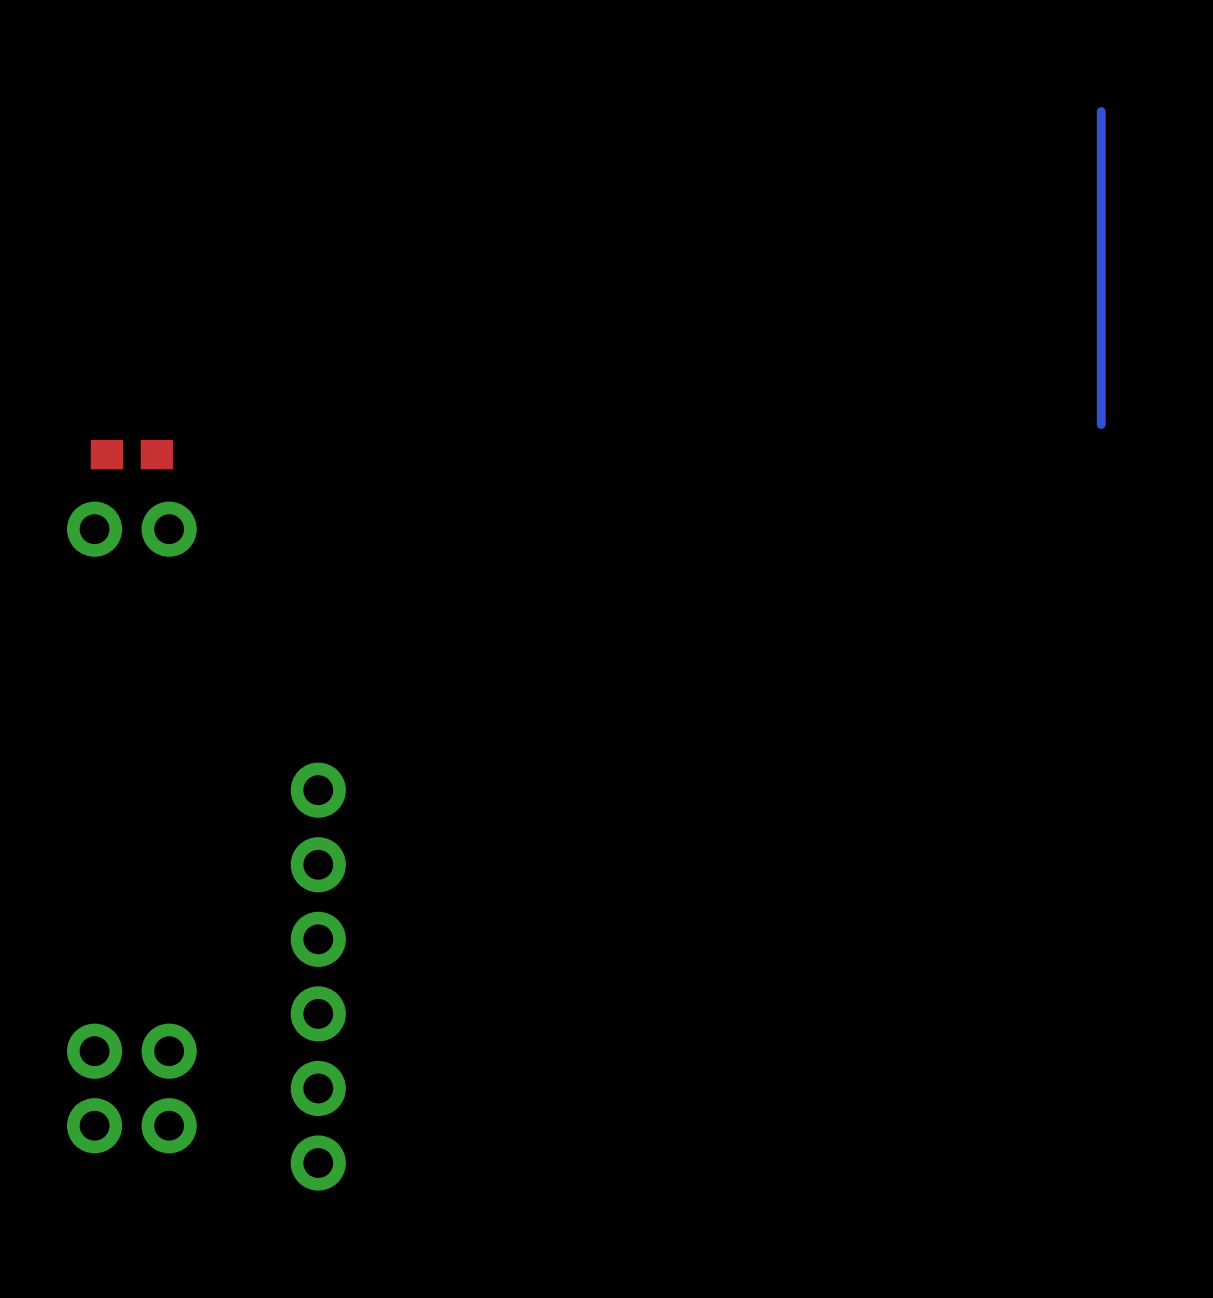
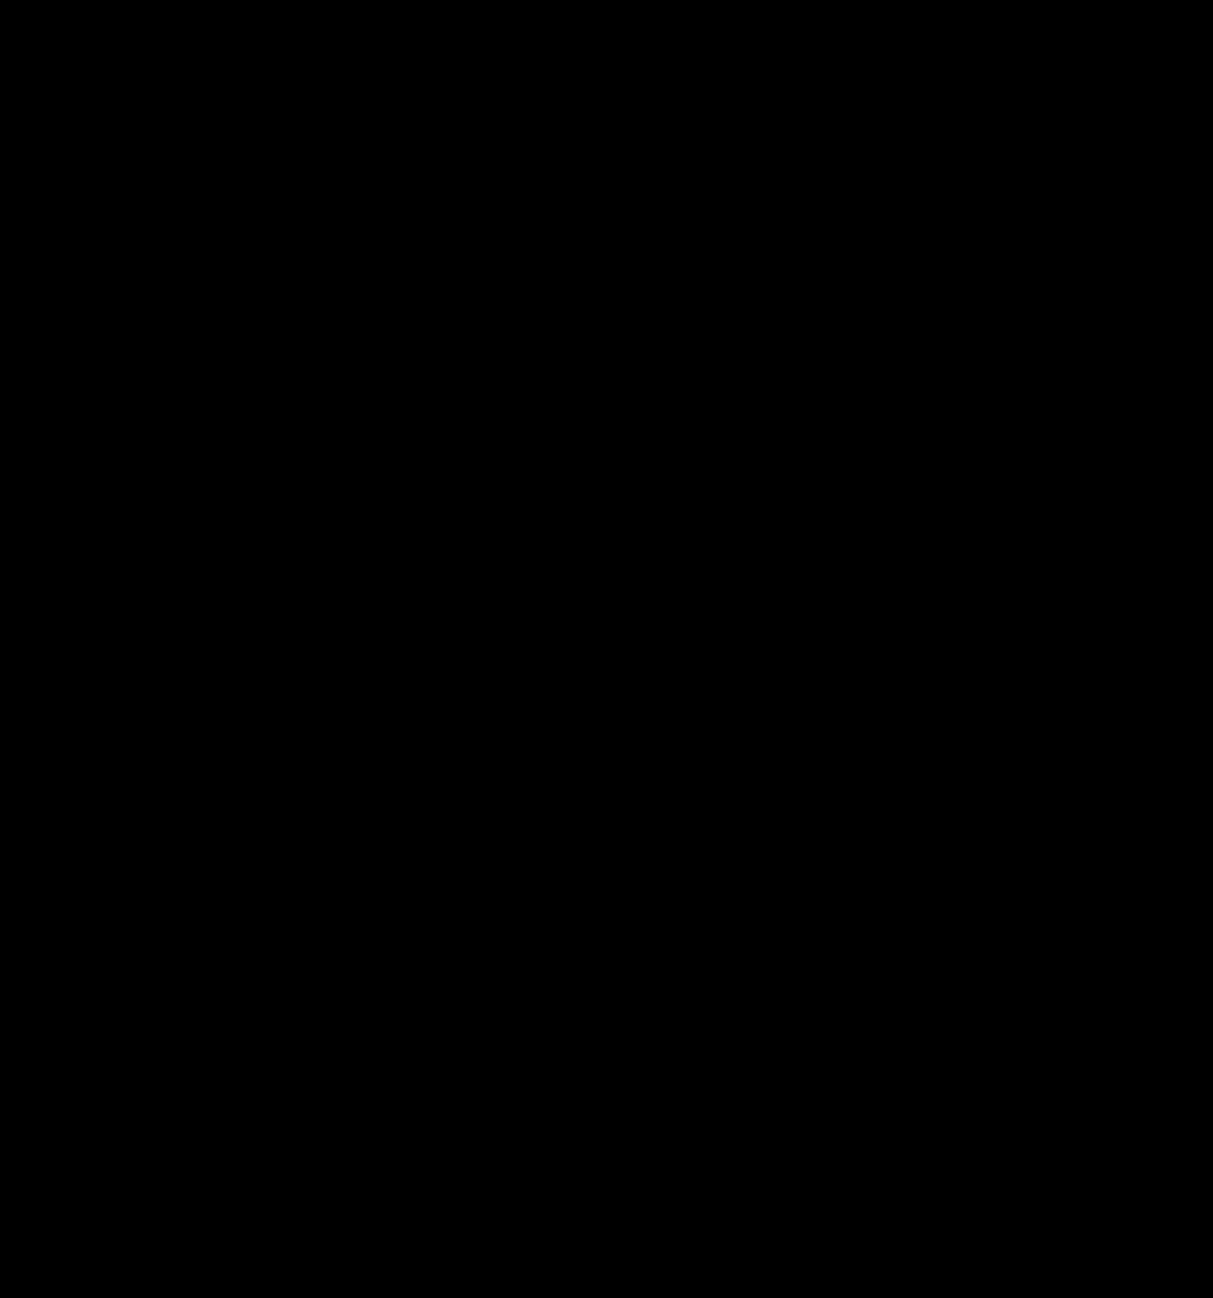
bottom track: (1101, 111) (1101, 424) -> none
part: (131, 454) -> none
part: (131, 529) -> none
part: (318, 976) -> none
part: (131, 1051) -> none
part: (131, 1125) -> none

